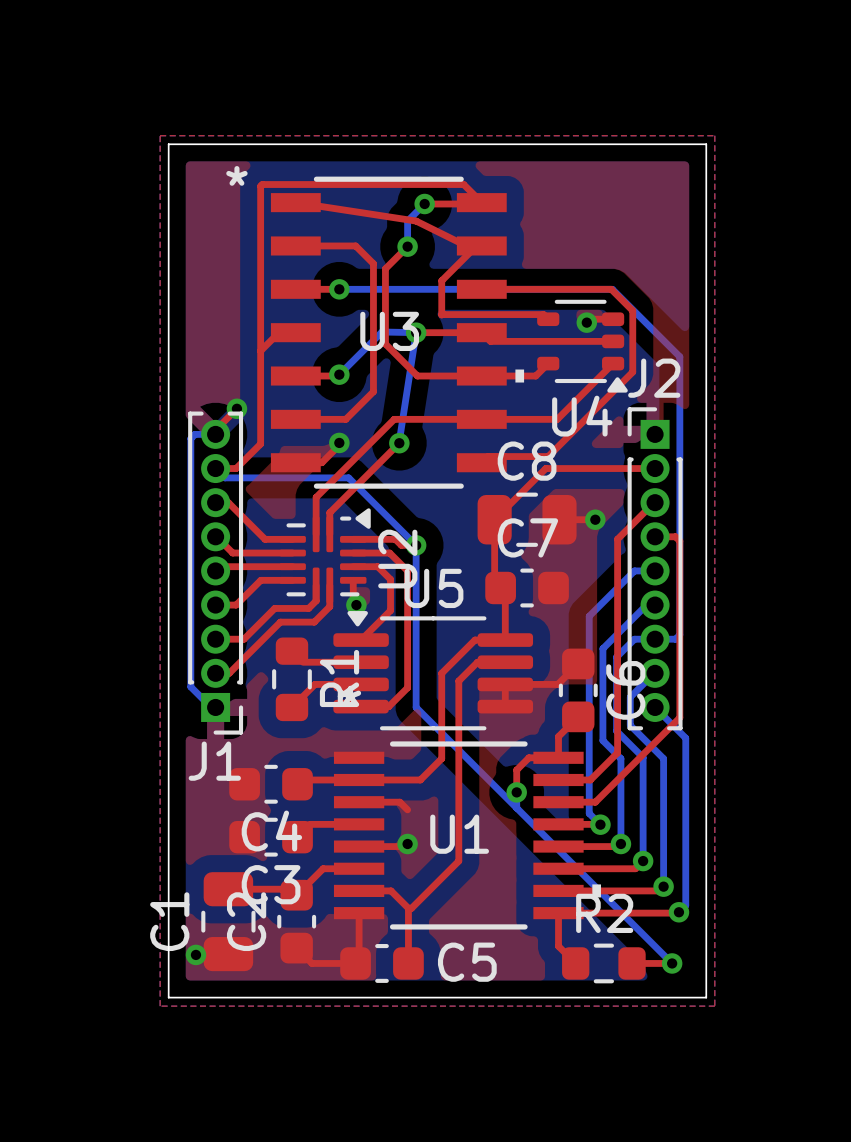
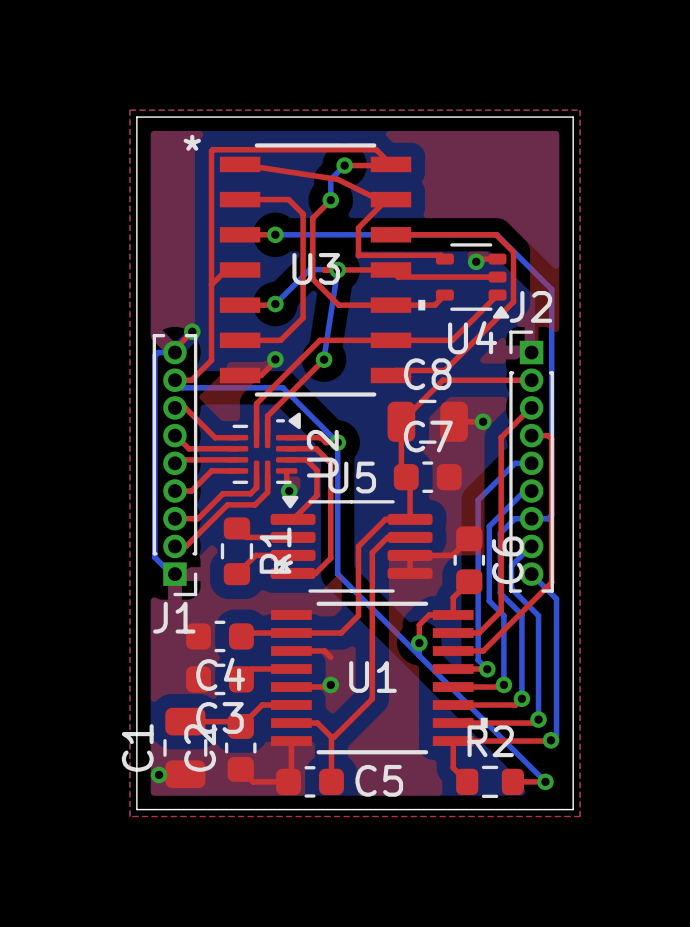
top track: none -> (324, 269) (337, 269)

